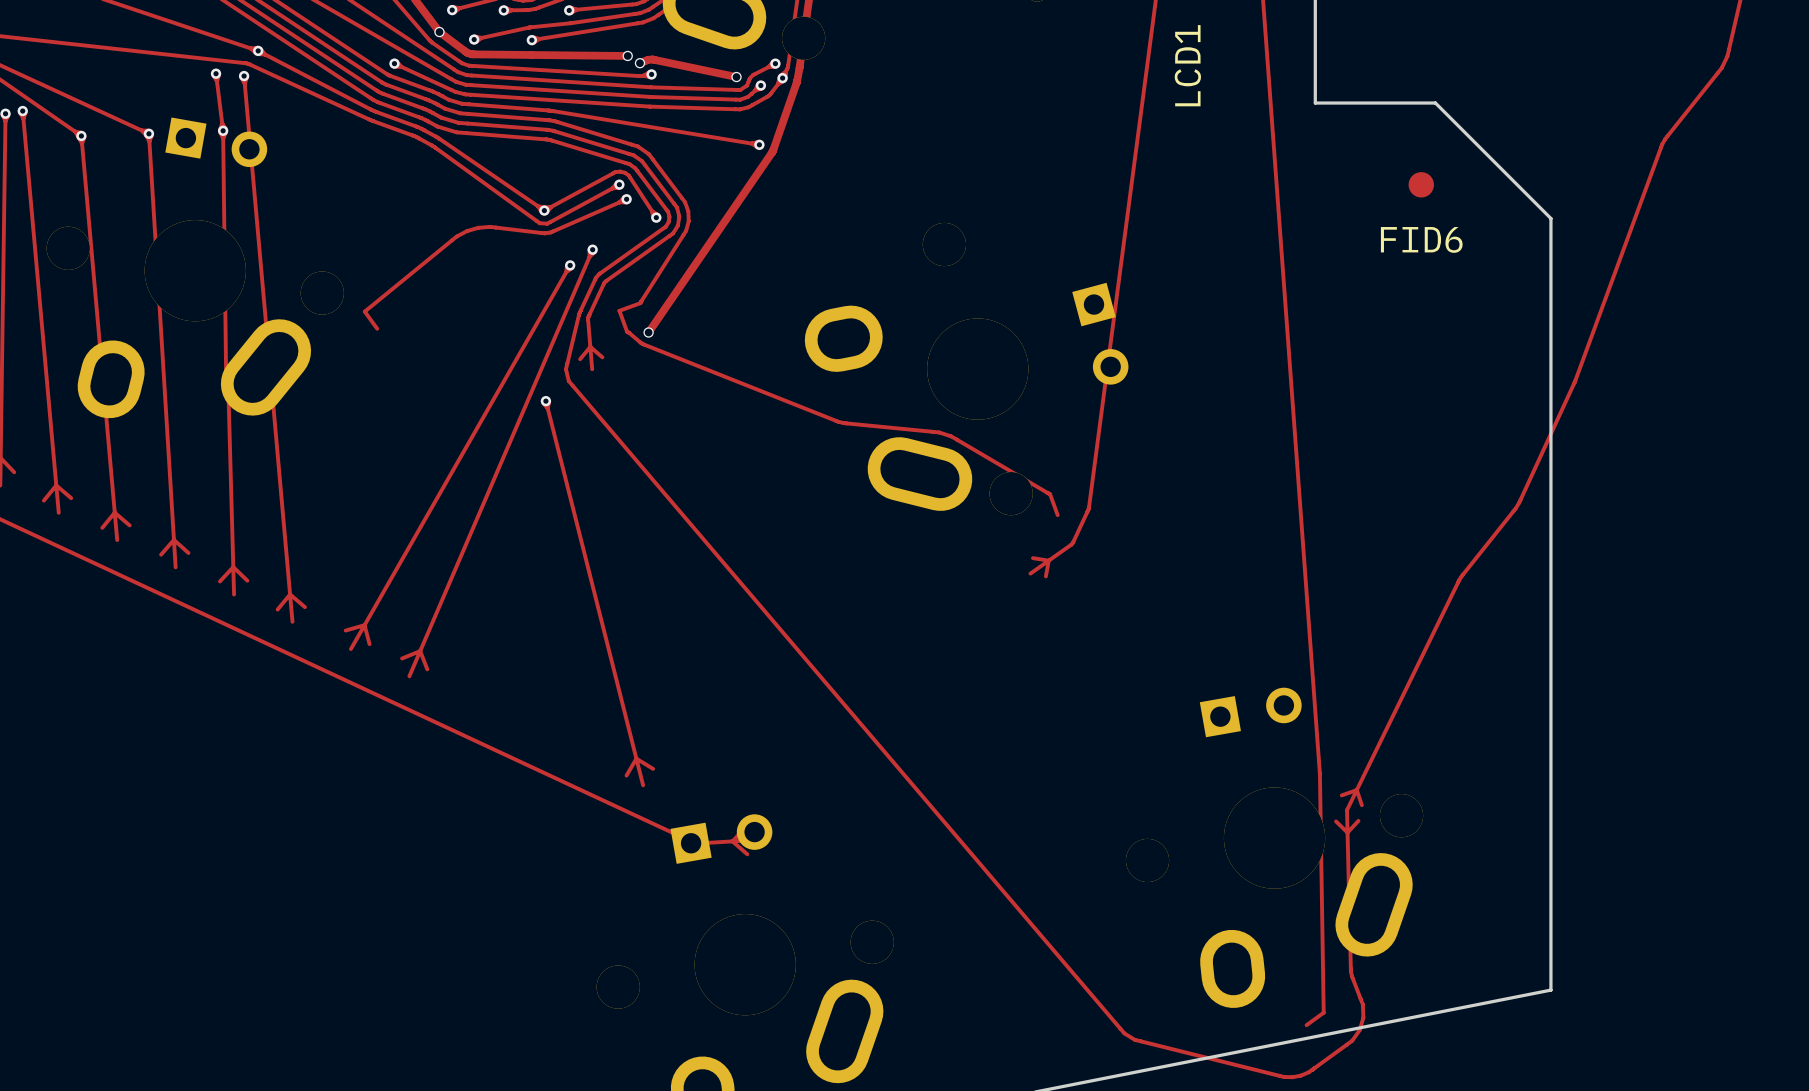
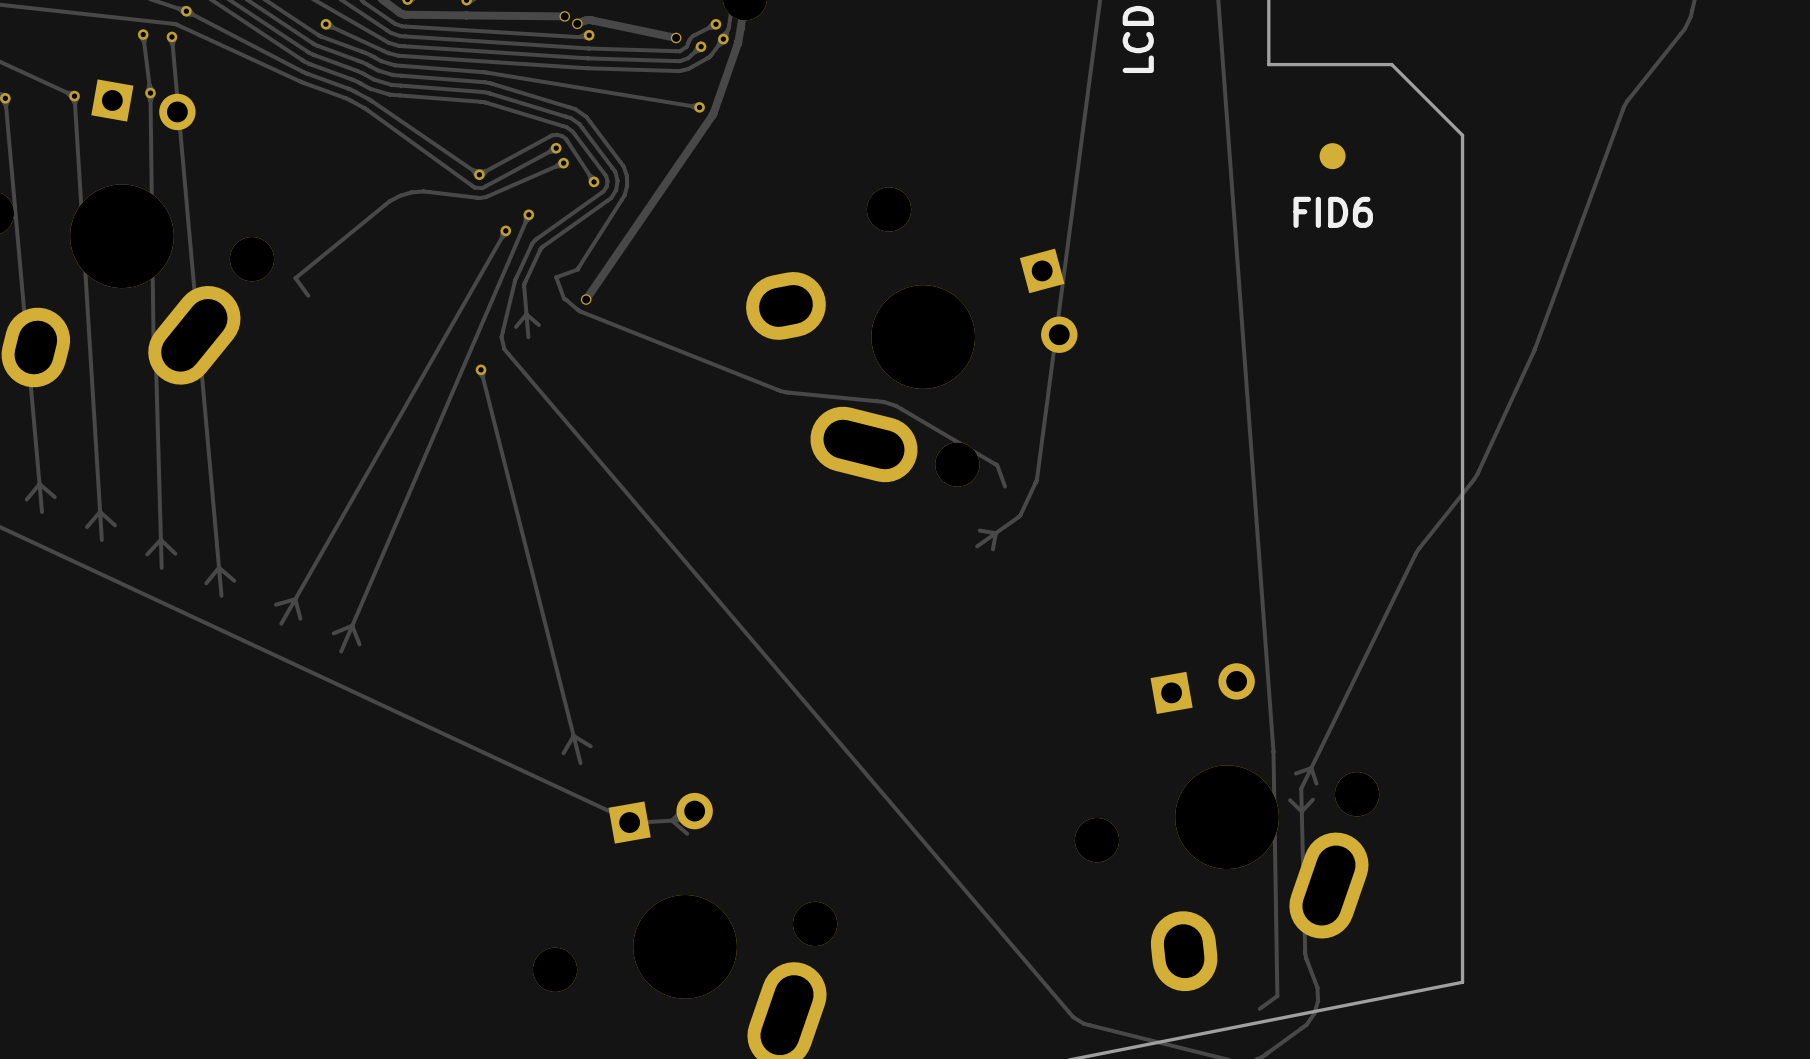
board edge: (1504, 172) (1550, 218) (1550, 990) (1504, 999) -> (1462, 135) (1462, 982)
FID6 position: (1421, 184) -> (1332, 156)

